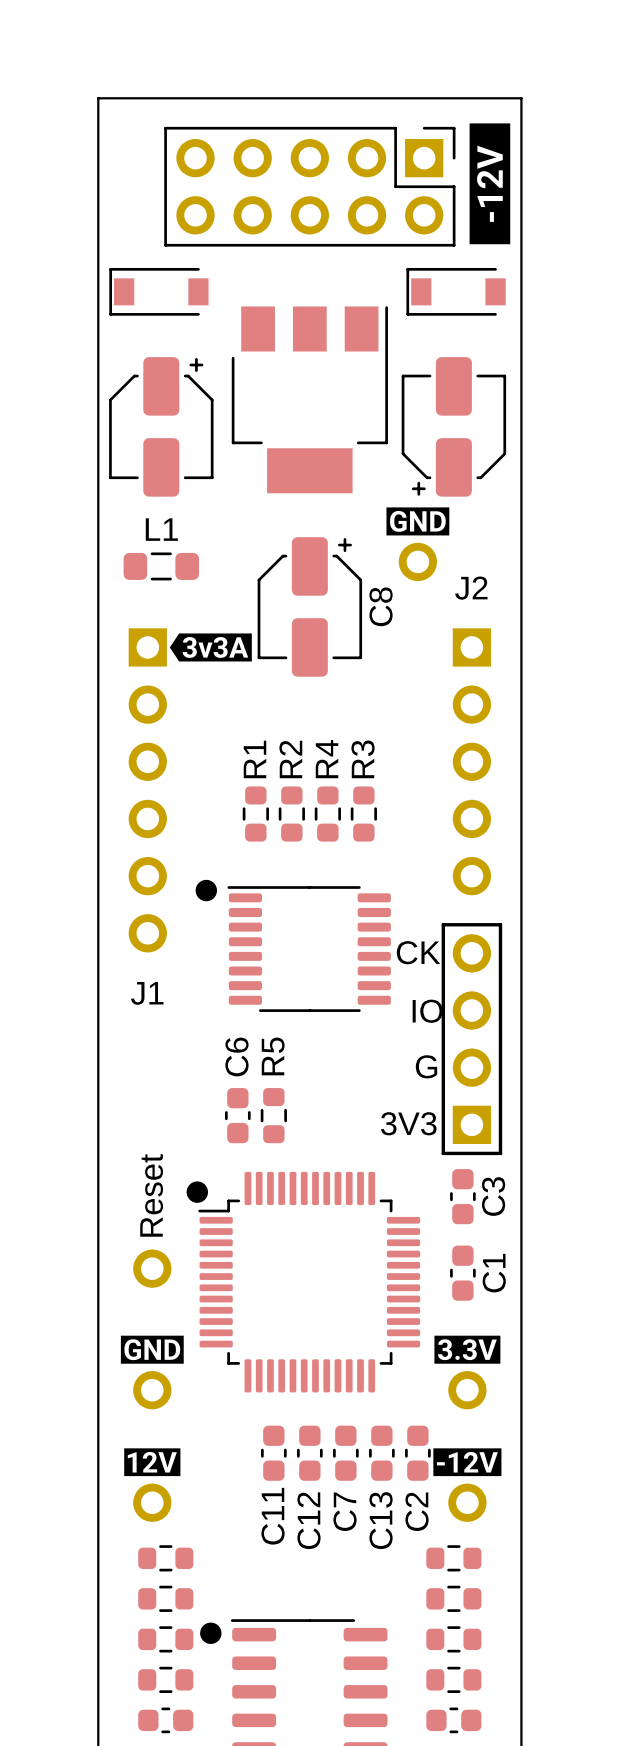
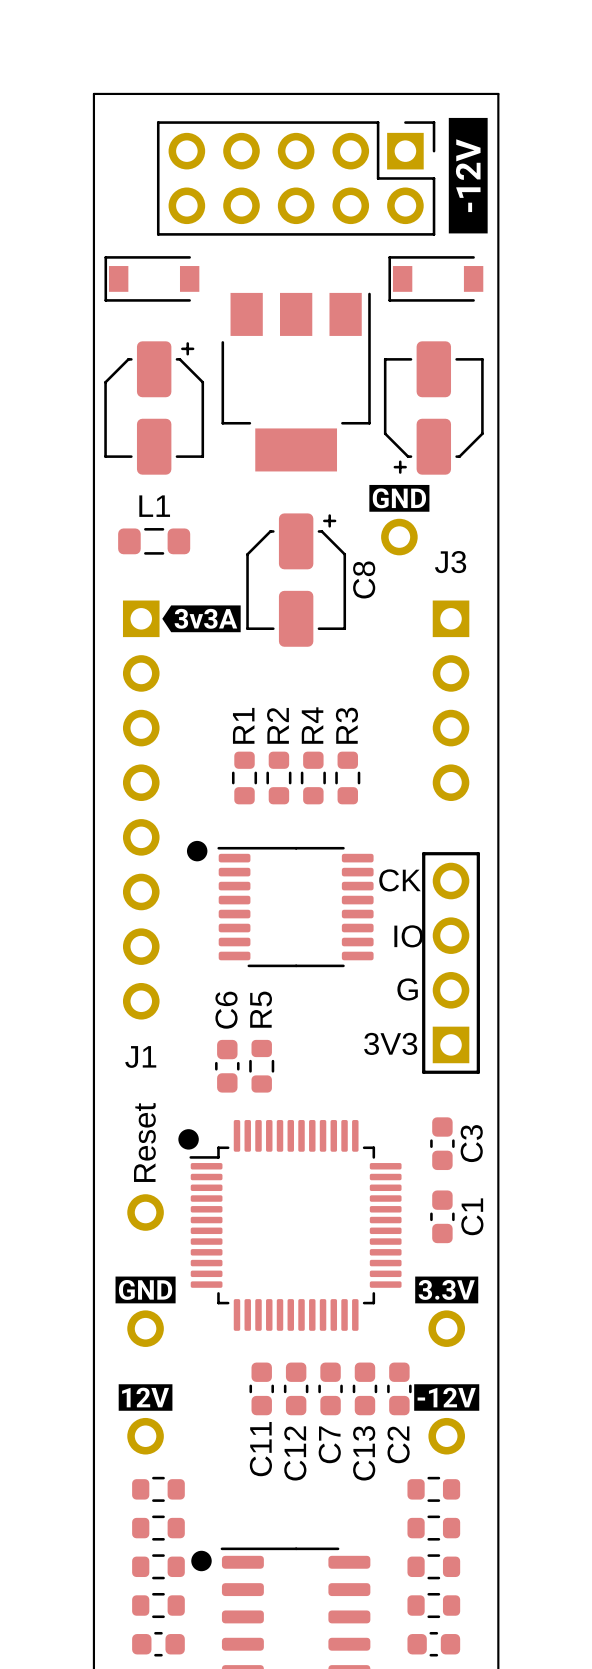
text: J2 (471, 588) -> J3 (450, 562)
part: (471, 761) -> none
part: none -> (141, 810)
text position: J1 (147, 993) -> J1 (140, 1056)
part position: (471, 1039) -> (451, 962)

